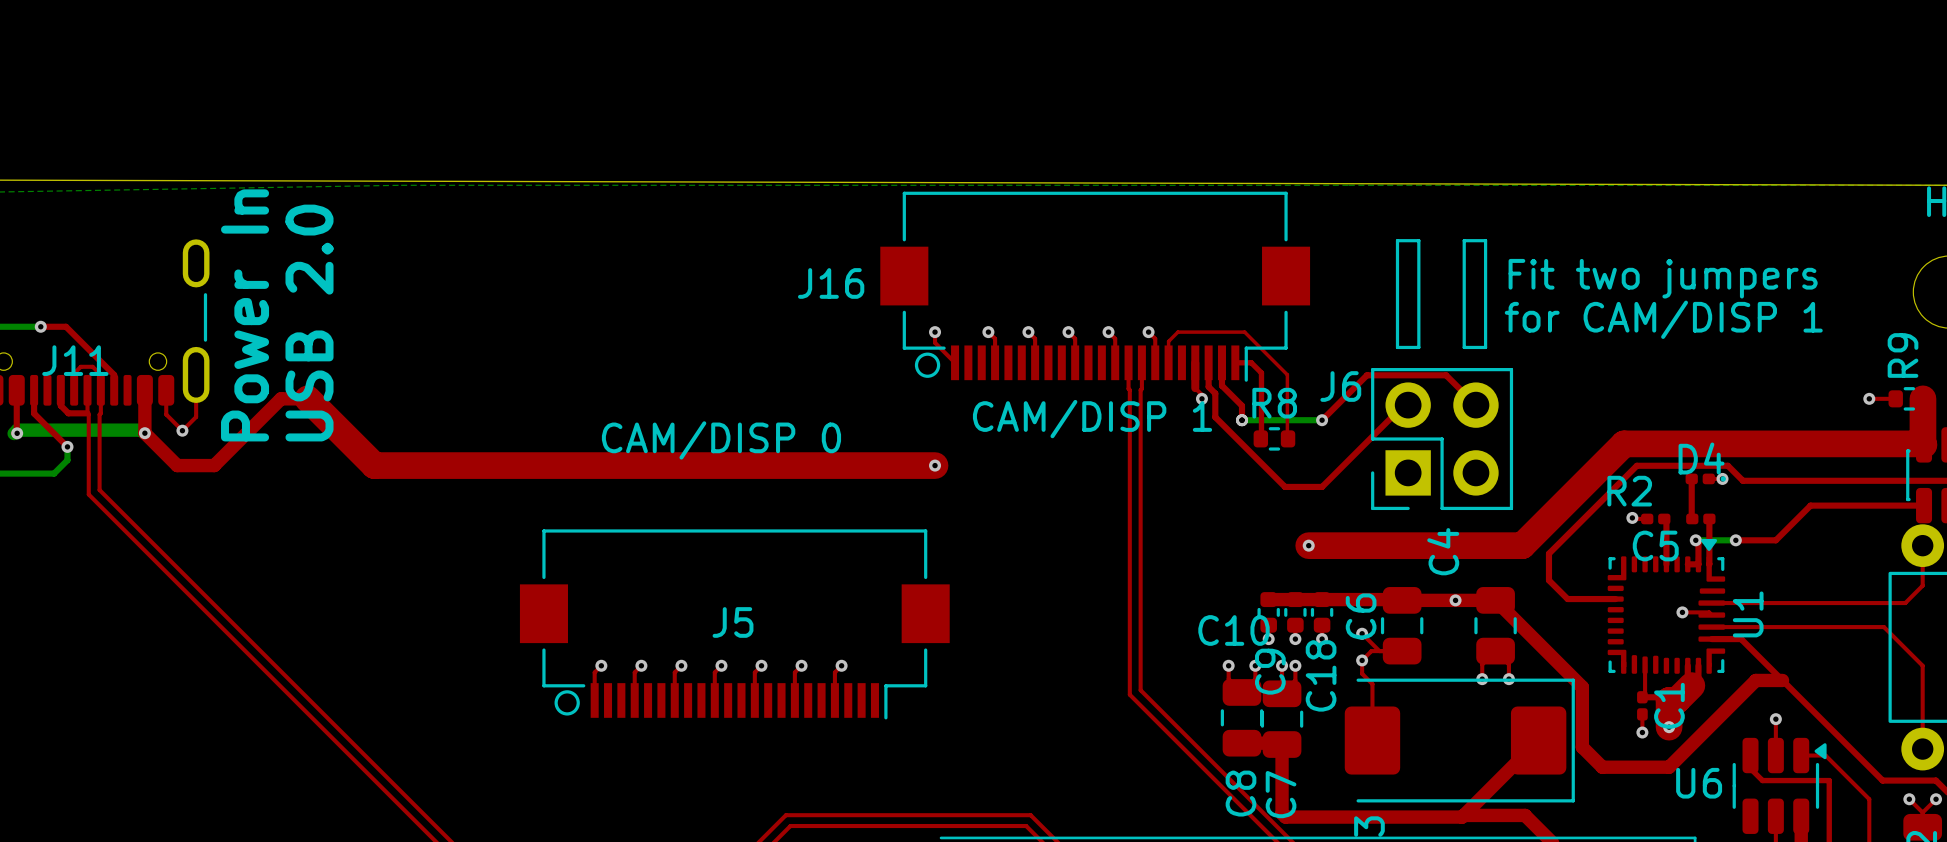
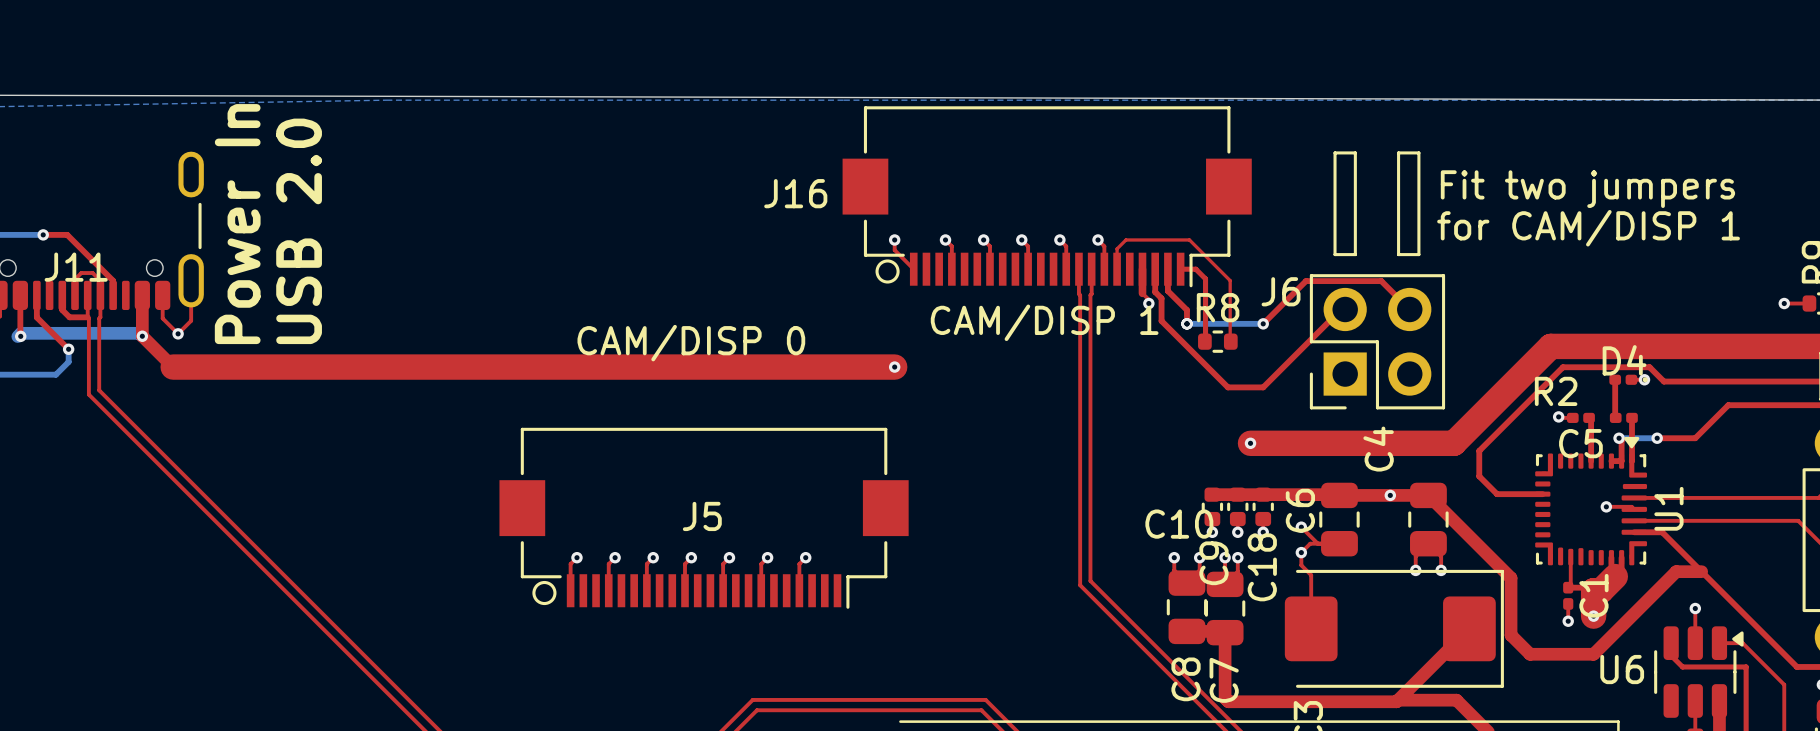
top track width: thin (177, 465) (214, 465) -> thick (173, 367) (208, 367)
top track: (214, 465) (281, 398) (307, 398) (374, 465) -> (208, 367) (360, 367)

